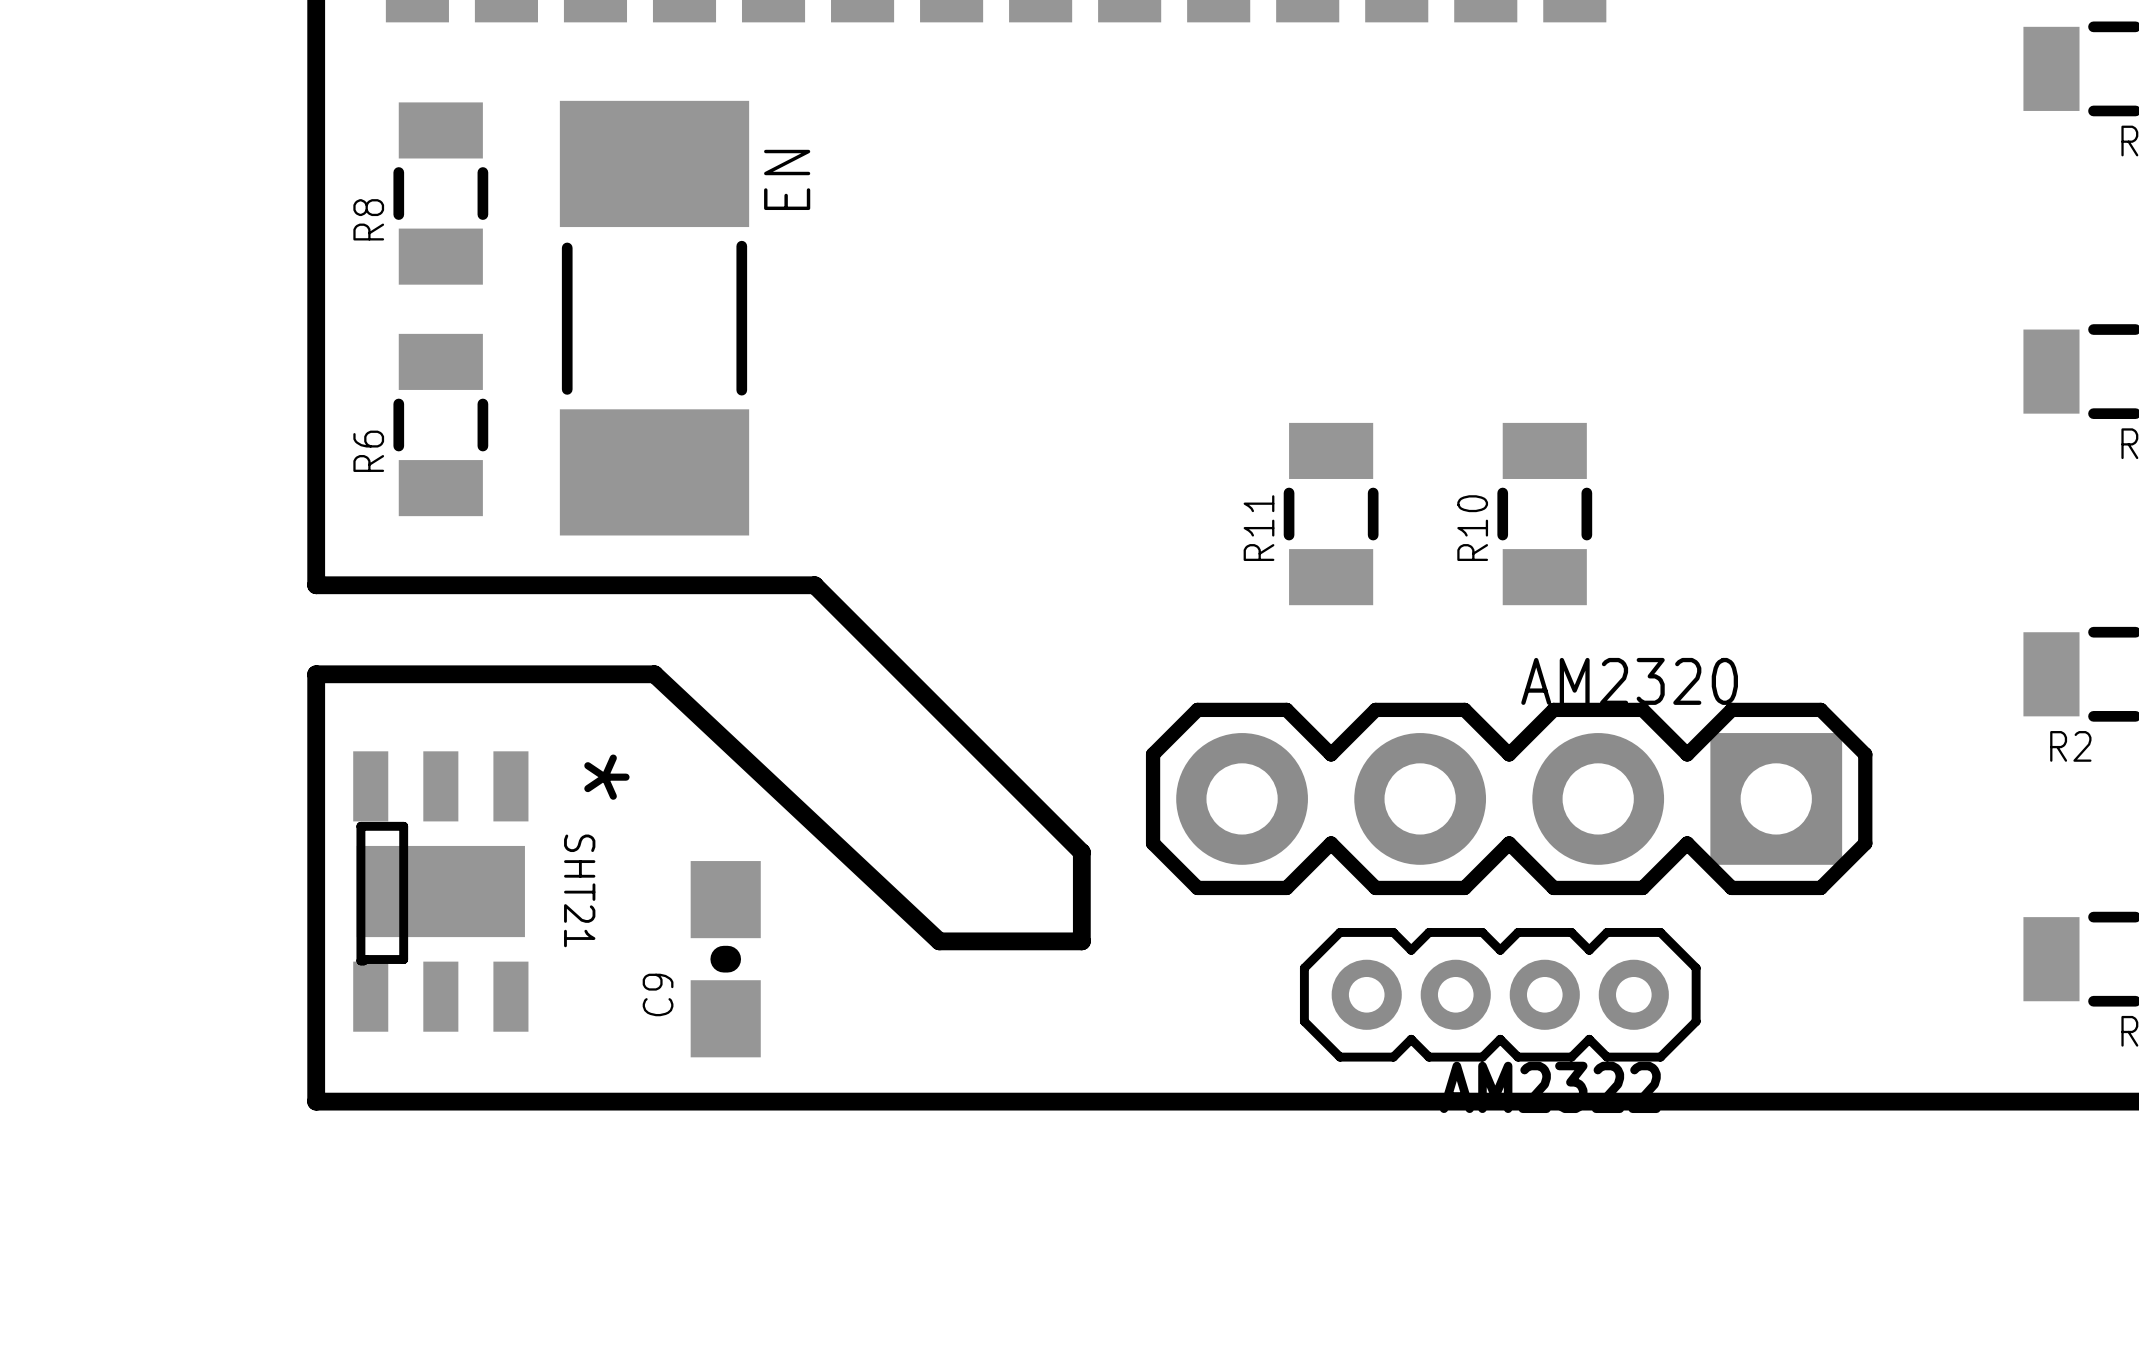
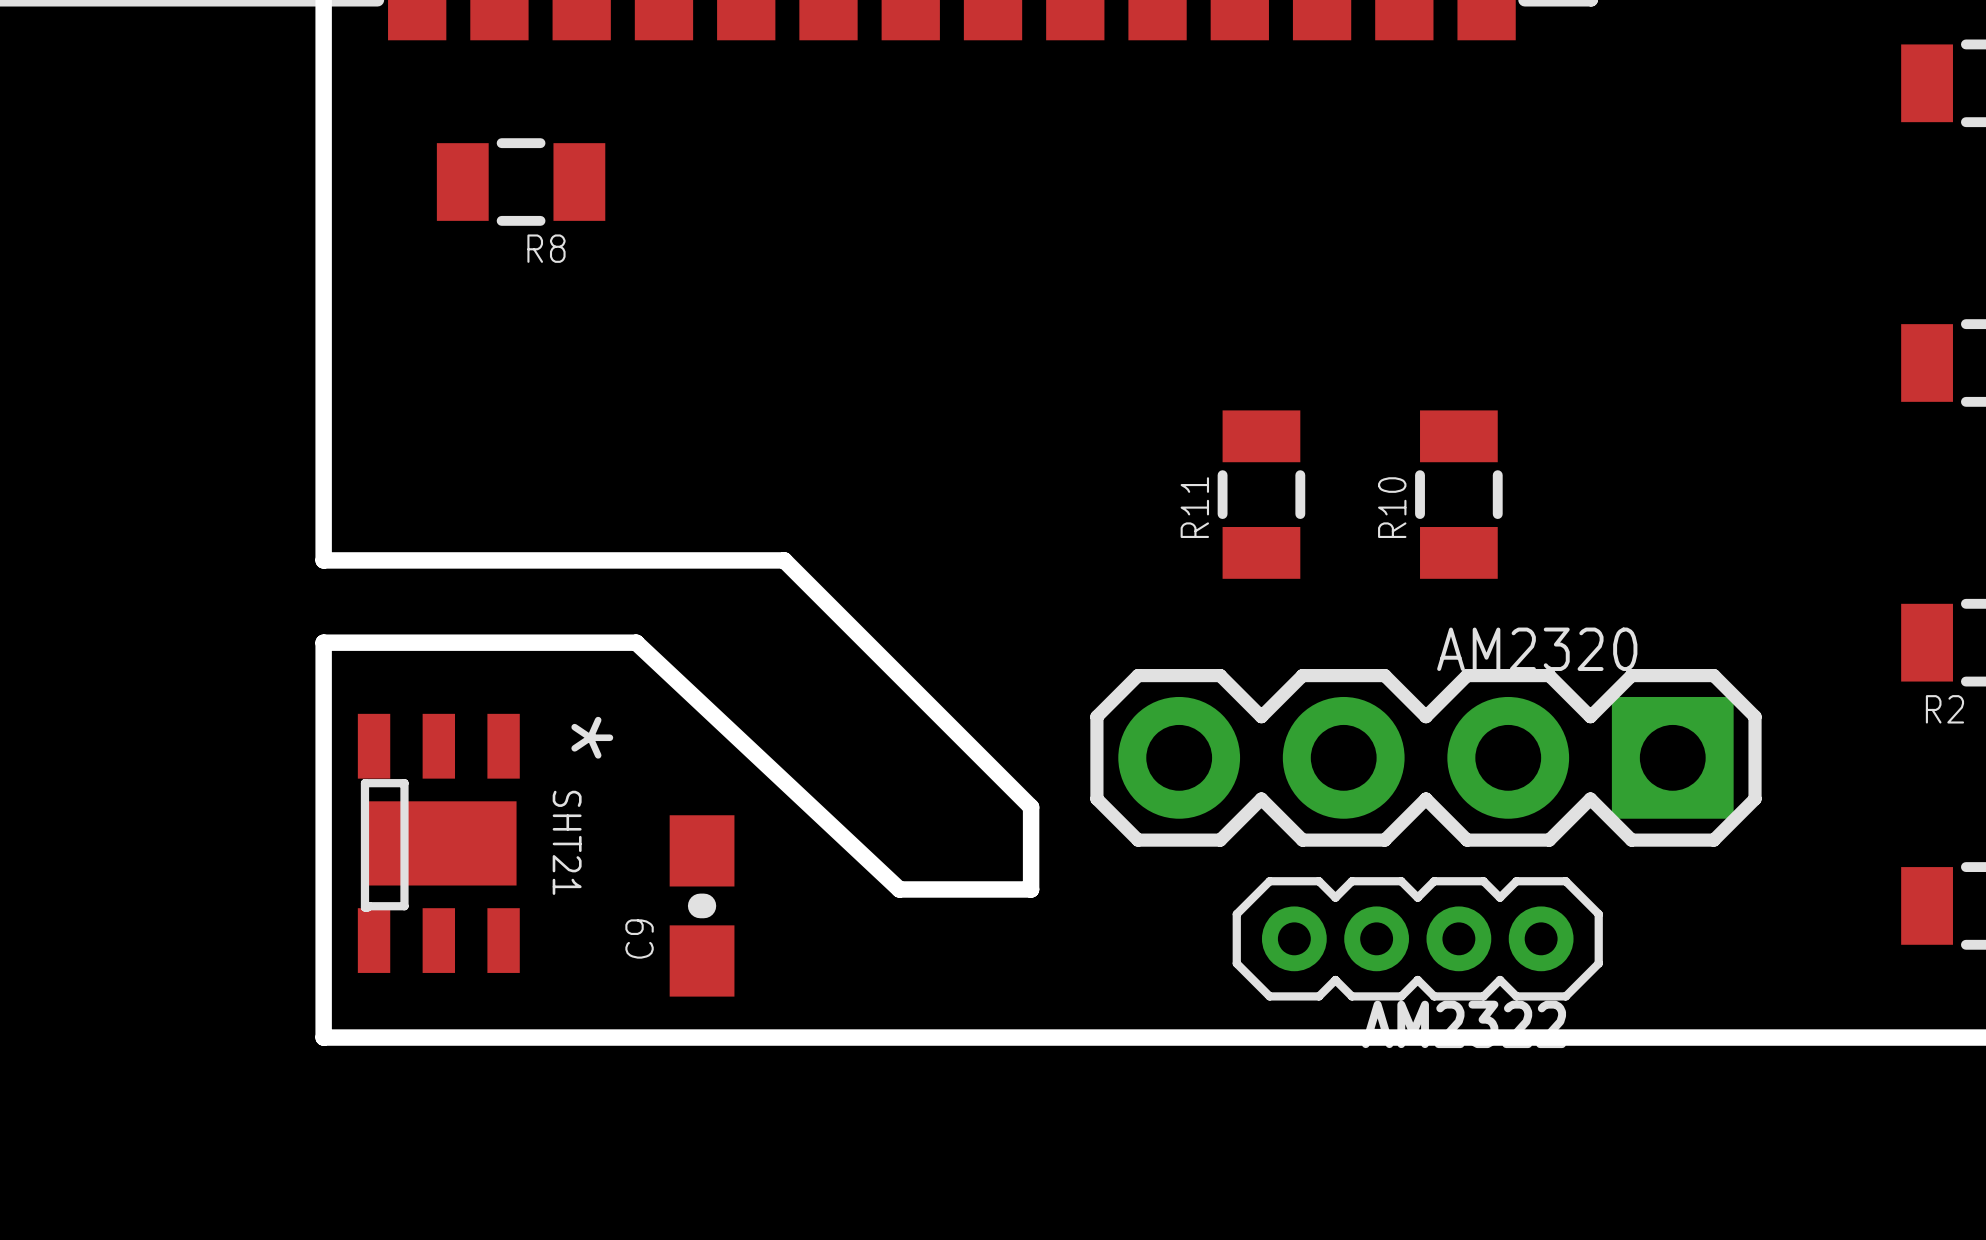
R8 rotation: 0° (440, 193) -> 90° clockwise (521, 182)
EN: (654, 318) -> none
R6: (440, 425) -> none

